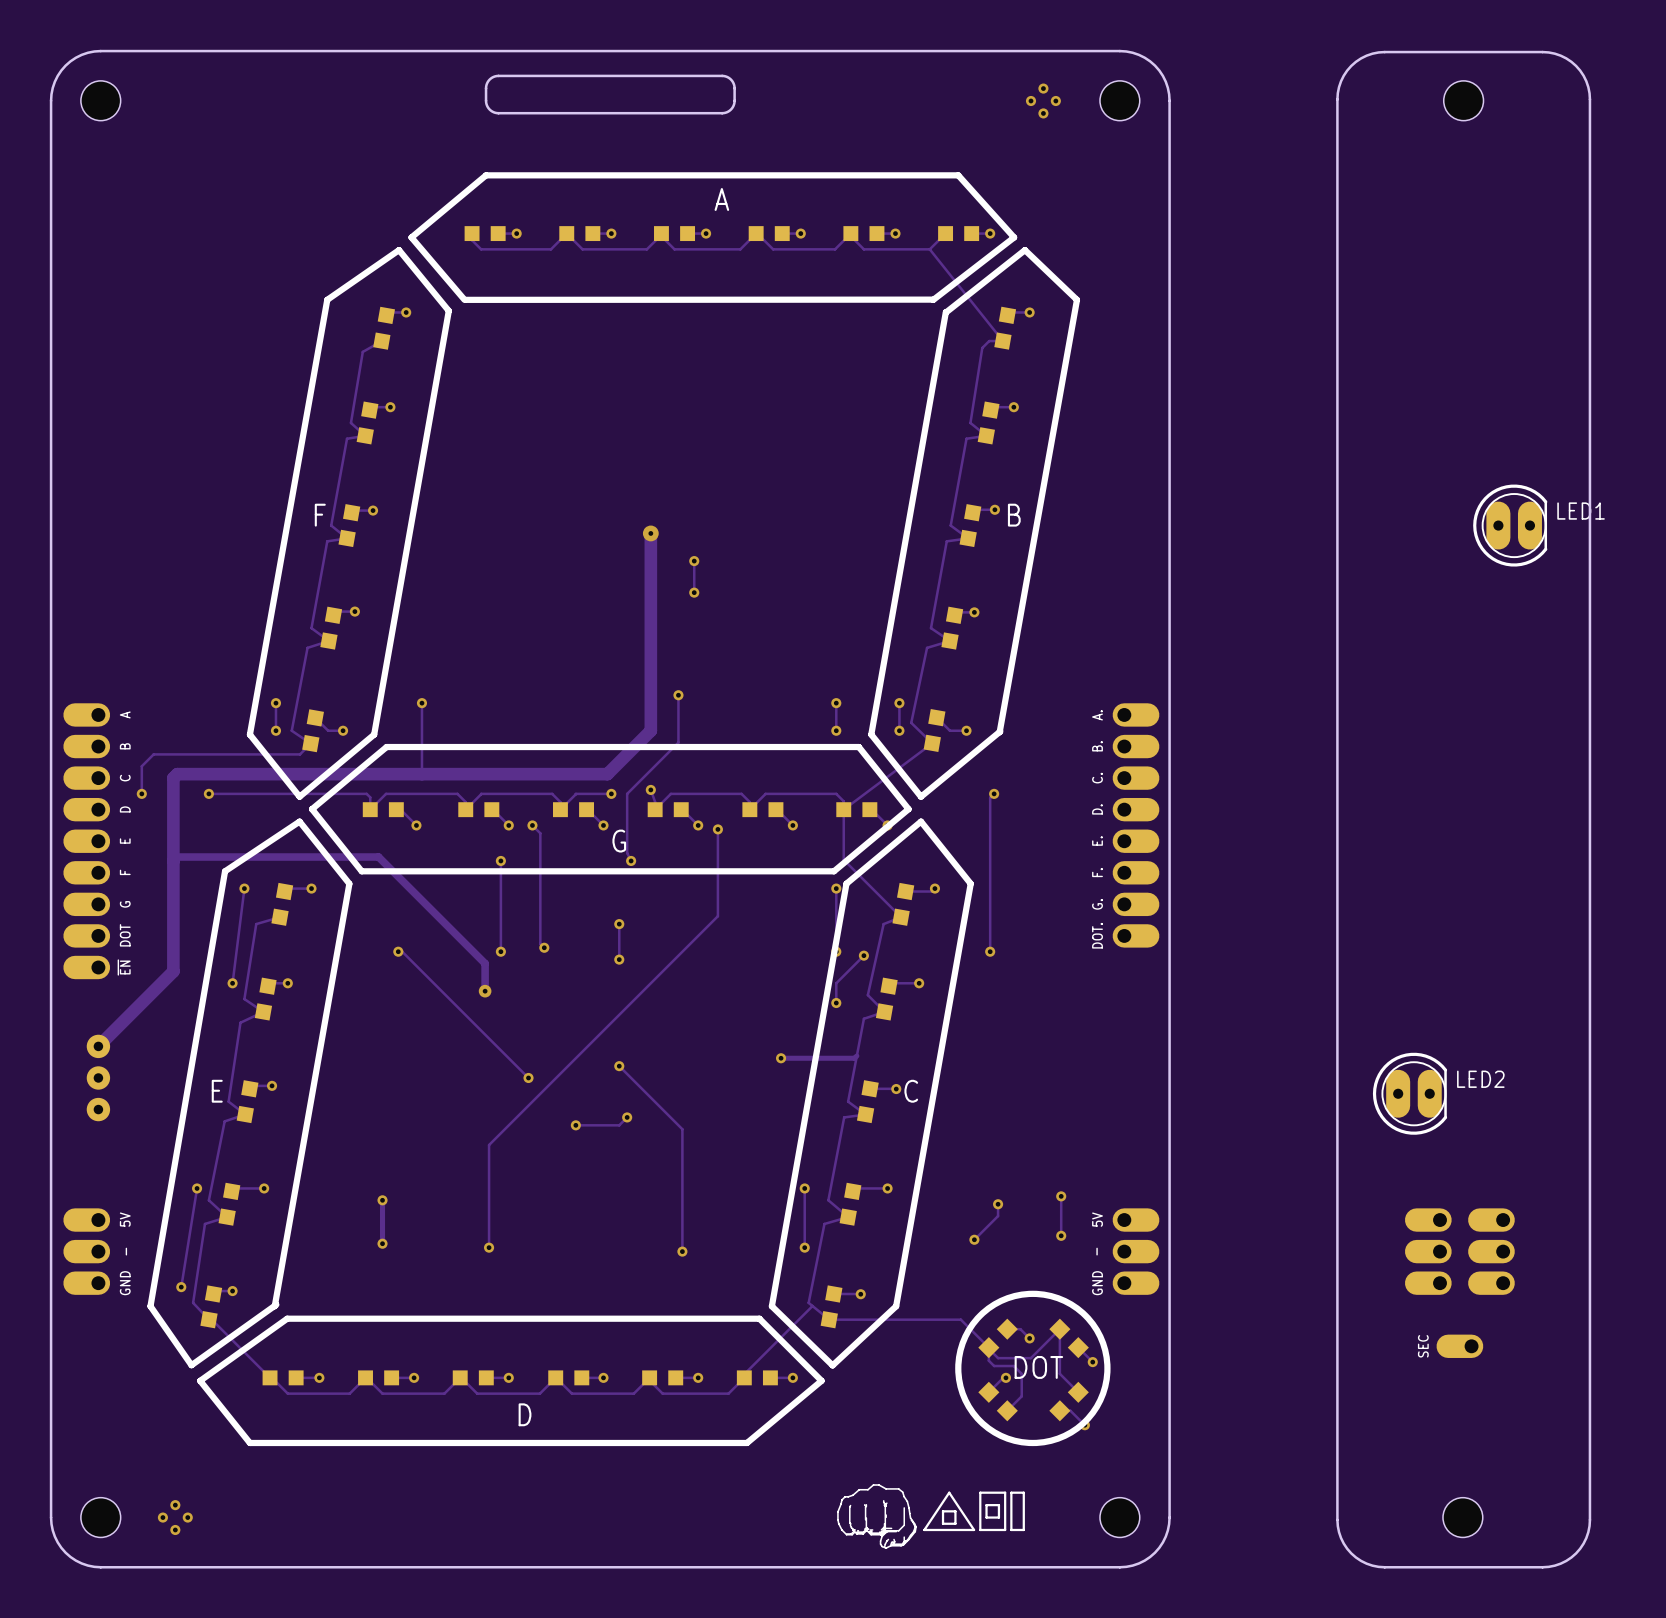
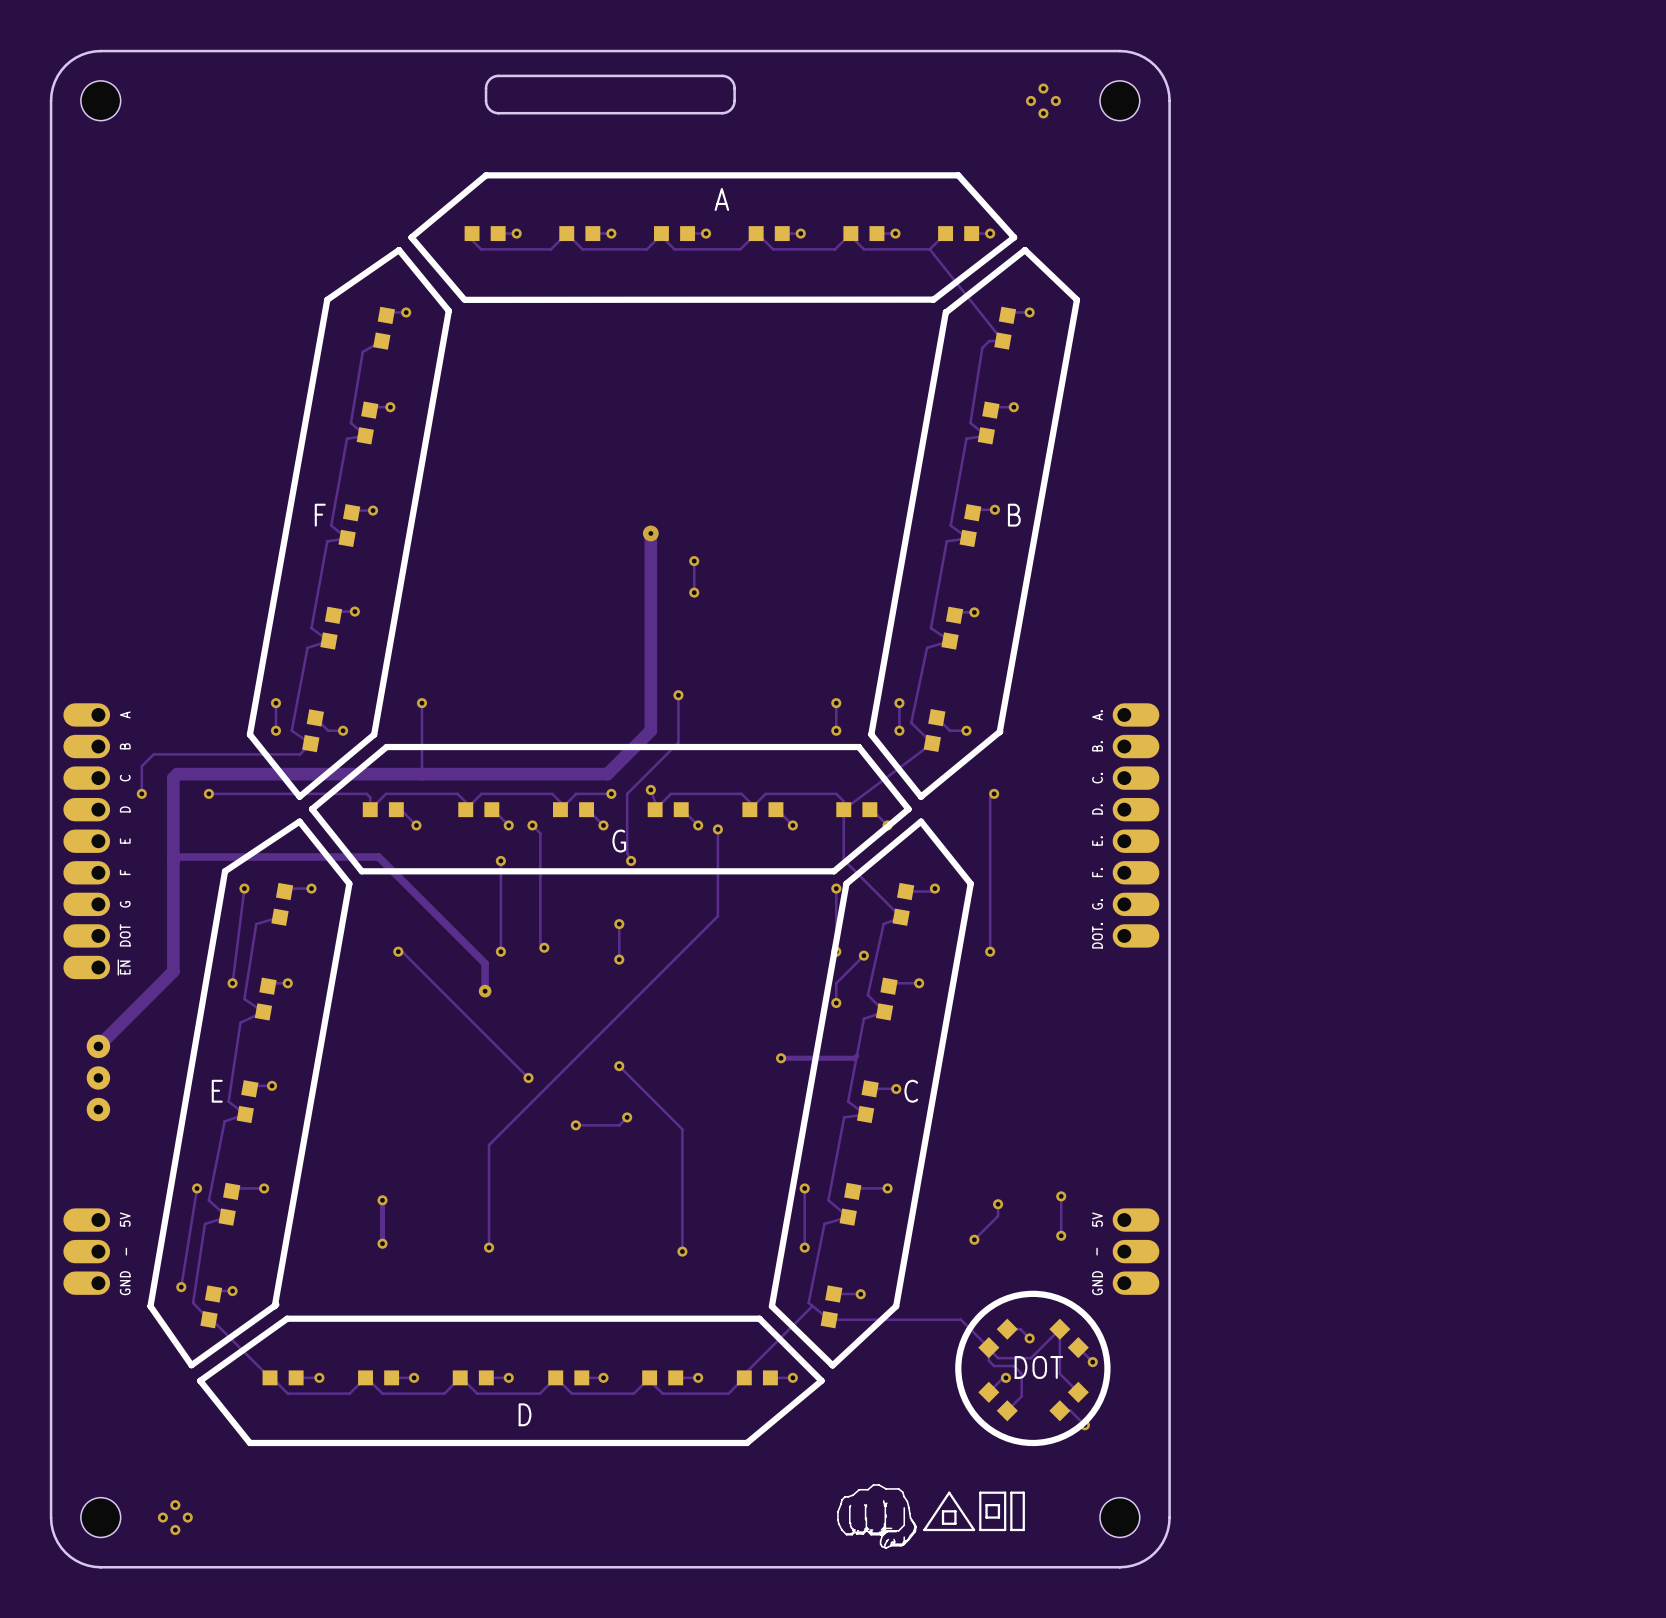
board edge: (1384, 52) (1554, 53) (1566, 58) (1580, 70) (1586, 81) (1589, 93) (1589, 1519) (1586, 1538) (1576, 1553) (1566, 1560) (1548, 1566) (1378, 1566) (1361, 1560) (1351, 1553) (1343, 1543) (1337, 1526) (1337, 99) (1341, 81) (1351, 65) (1366, 55) (1384, 52) -> none
hole: (1463, 100) -> none
LED1: (1510, 525) -> none
LED2: (1410, 1093) -> none
part: (1428, 1220) -> none
part: (1491, 1220) -> none
part: (1428, 1251) -> none
part: (1491, 1251) -> none
part: (1428, 1283) -> none
part: (1491, 1283) -> none
SEC: (1459, 1346) -> none
hole: (1462, 1517) -> none

